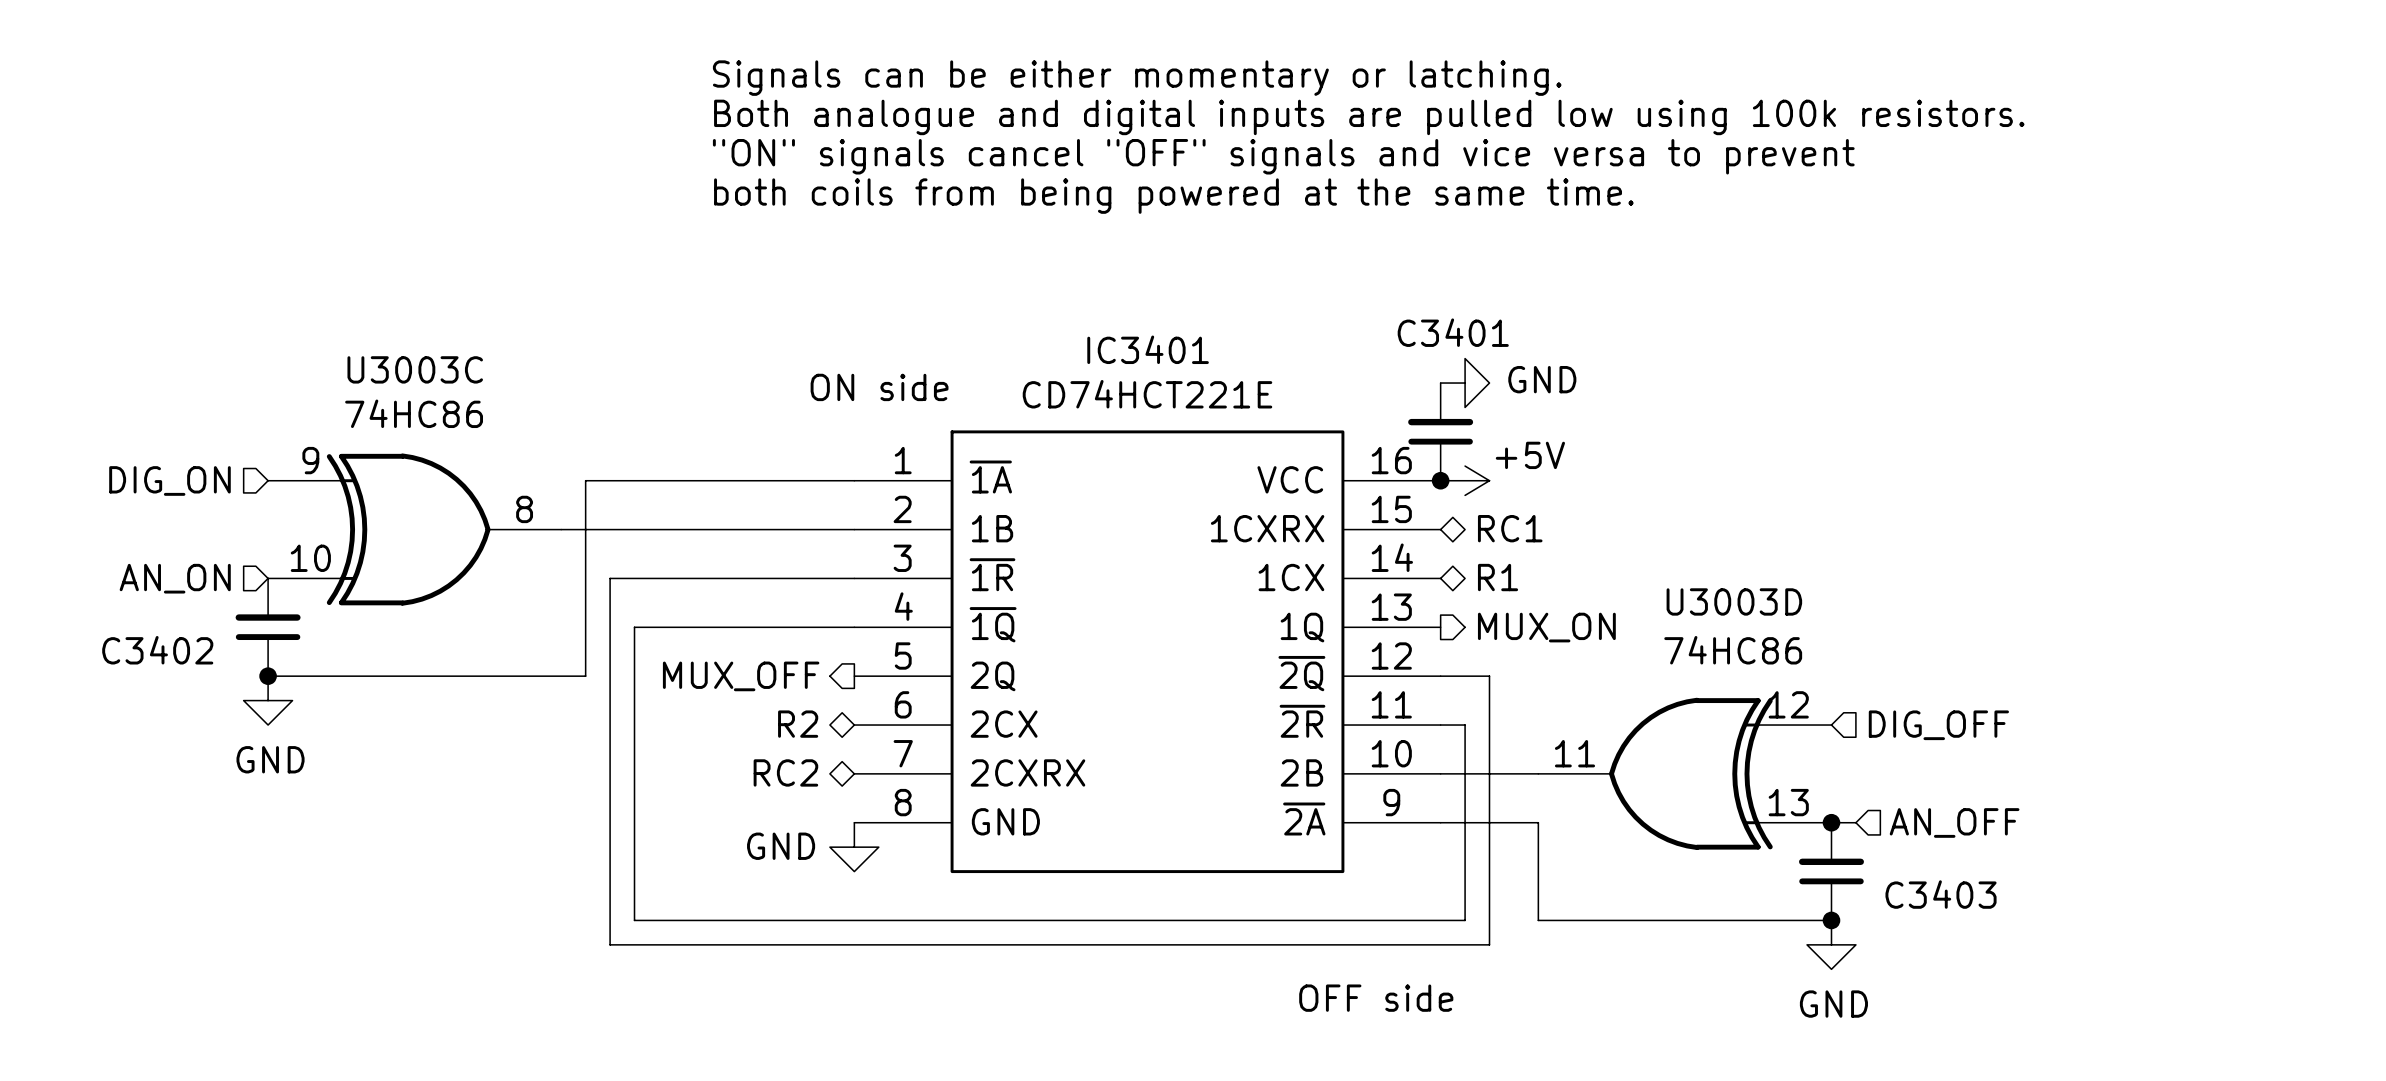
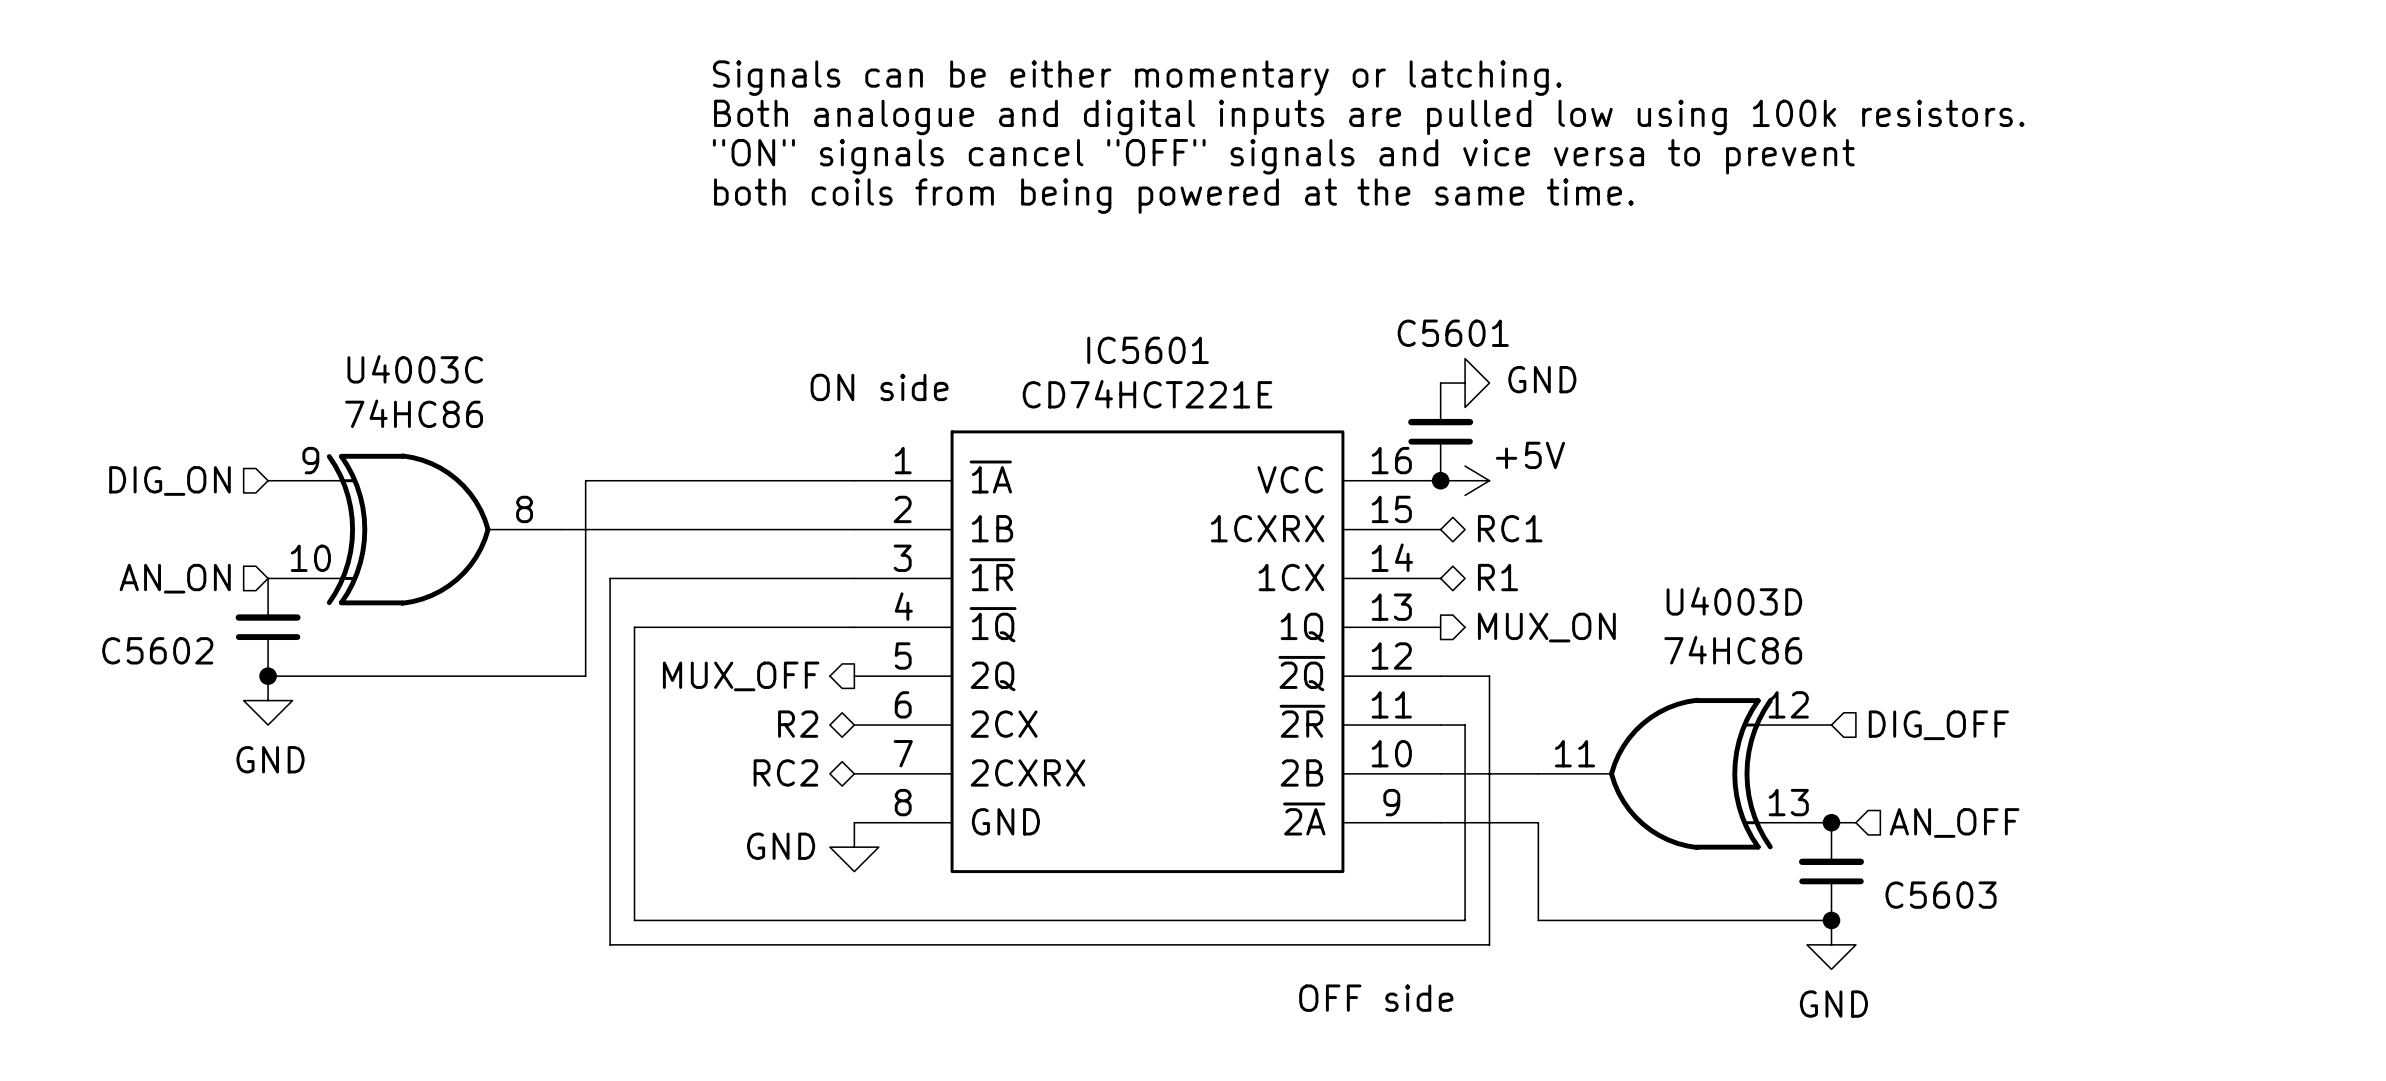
C3401 name: C3401 (1453, 332) -> C5601 (1453, 333)
IC3401 name: IC3401 (1148, 349) -> IC5601 (1148, 350)
U3003C name: U3003C (415, 369) -> U4003C (415, 369)
U3003D name: U3003D (1734, 601) -> U4003D (1734, 601)
C3402 name: C3402 (157, 650) -> C5602 (157, 650)
C3403 name: C3403 (1941, 894) -> C5603 (1941, 895)

